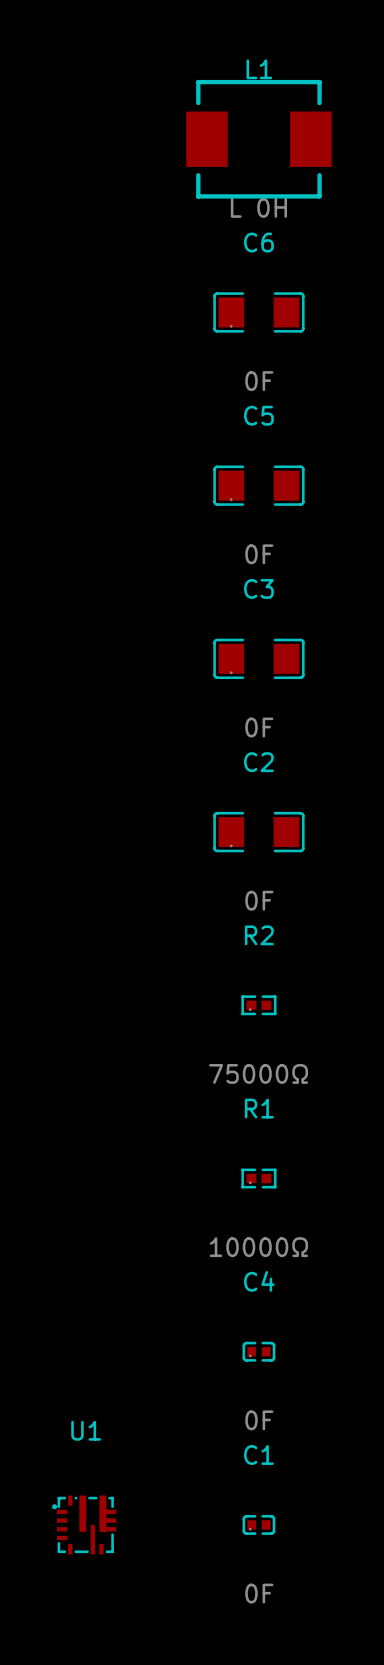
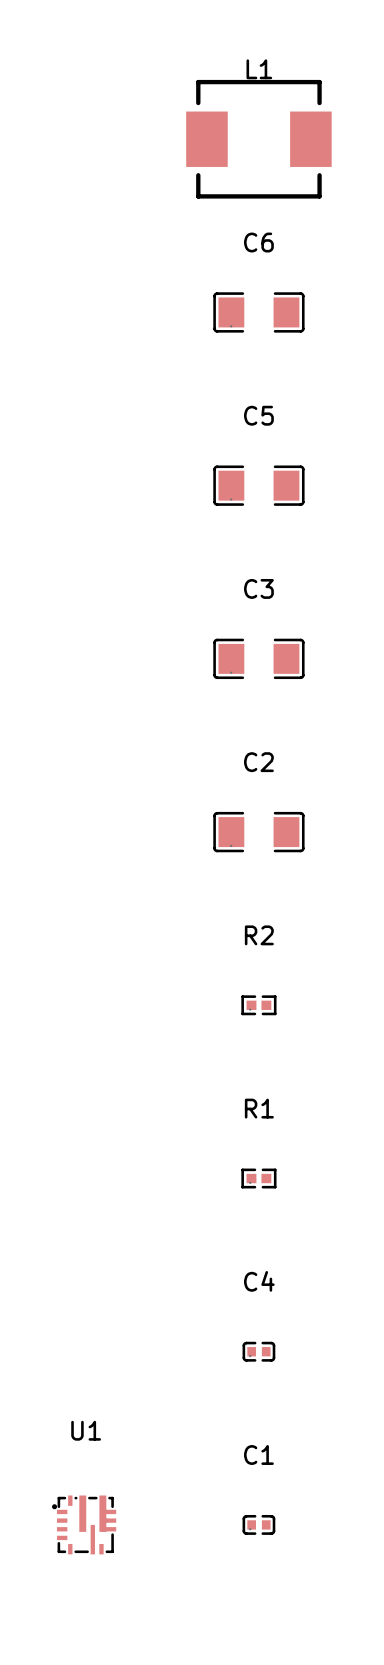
L1 value: L 0H (258, 207) -> none
C6 value: 0F (259, 381) -> none
C5 value: 0F (259, 554) -> none
C3 value: 0F (259, 727) -> none
C2 value: 0F (259, 900) -> none
R2 value: 75000Ω (258, 1073) -> none
R1 value: 10000Ω (258, 1247) -> none
C4 value: 0F (259, 1420) -> none
C1 value: 0F (259, 1593) -> none

